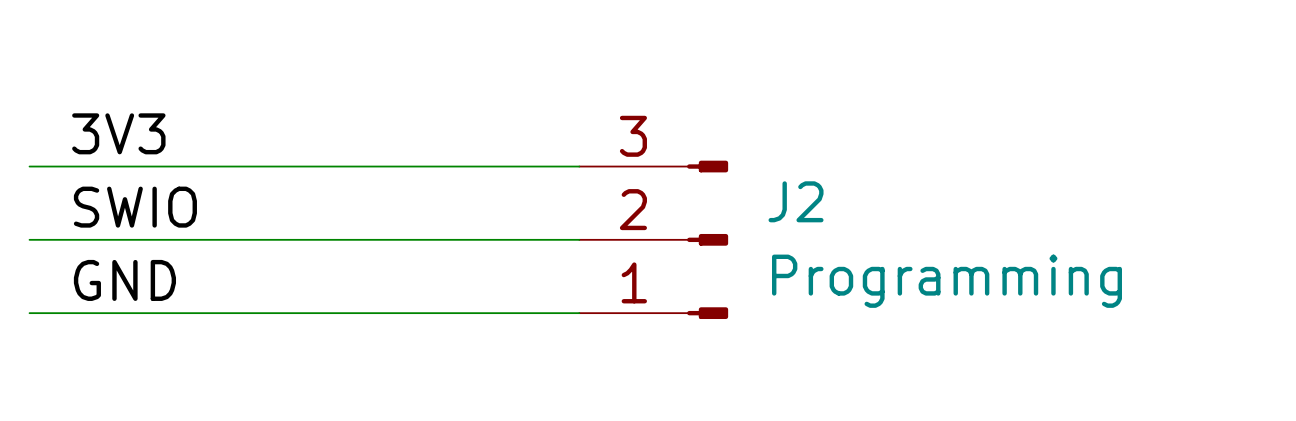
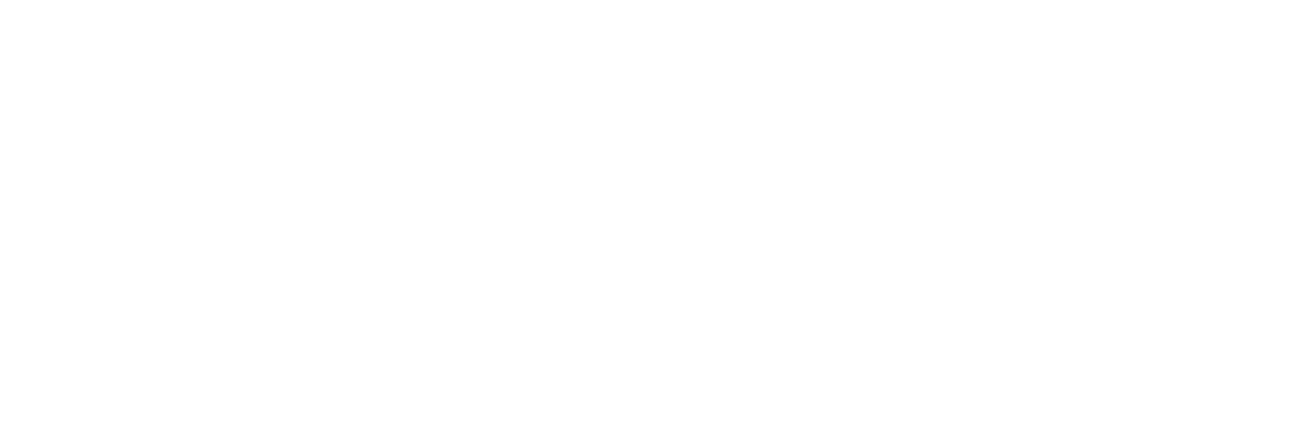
label: 3V3 (118, 133) -> none
wire: (29, 166) (579, 166) -> none
label: SWIO (135, 207) -> none
wire: (29, 239) (579, 239) -> none
J2: Programming (653, 239) -> none
label: GND (124, 280) -> none
wire: (29, 313) (579, 313) -> none

